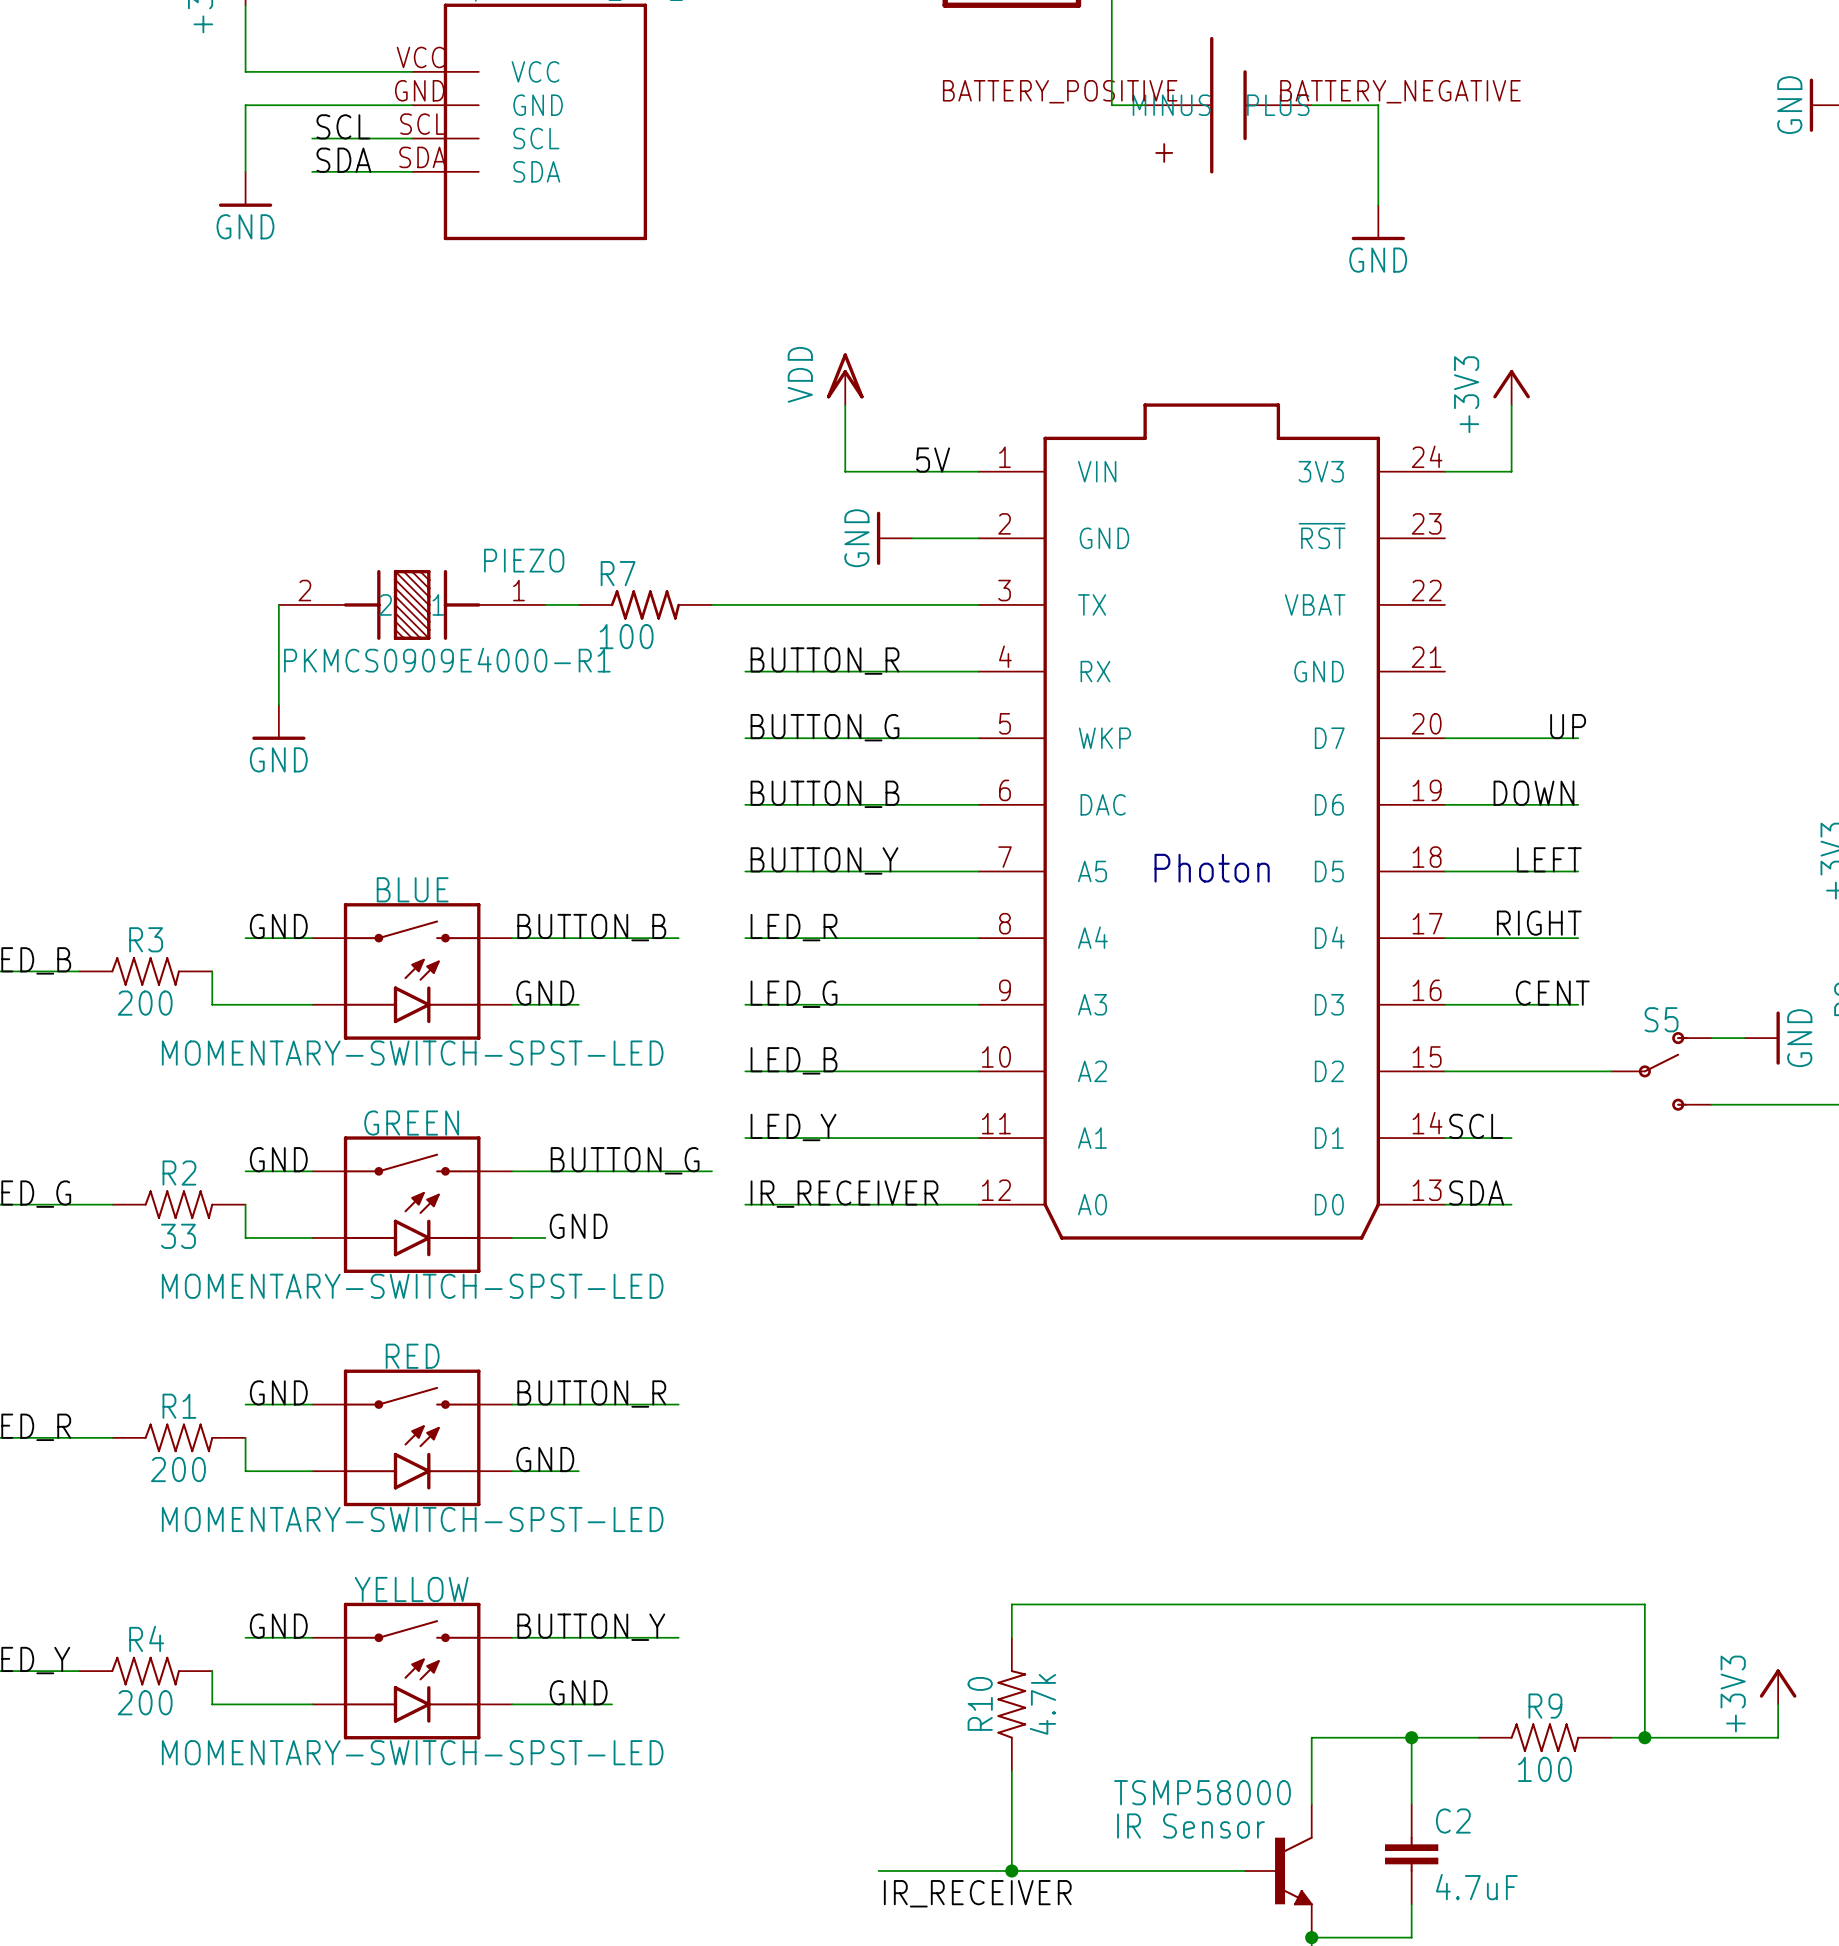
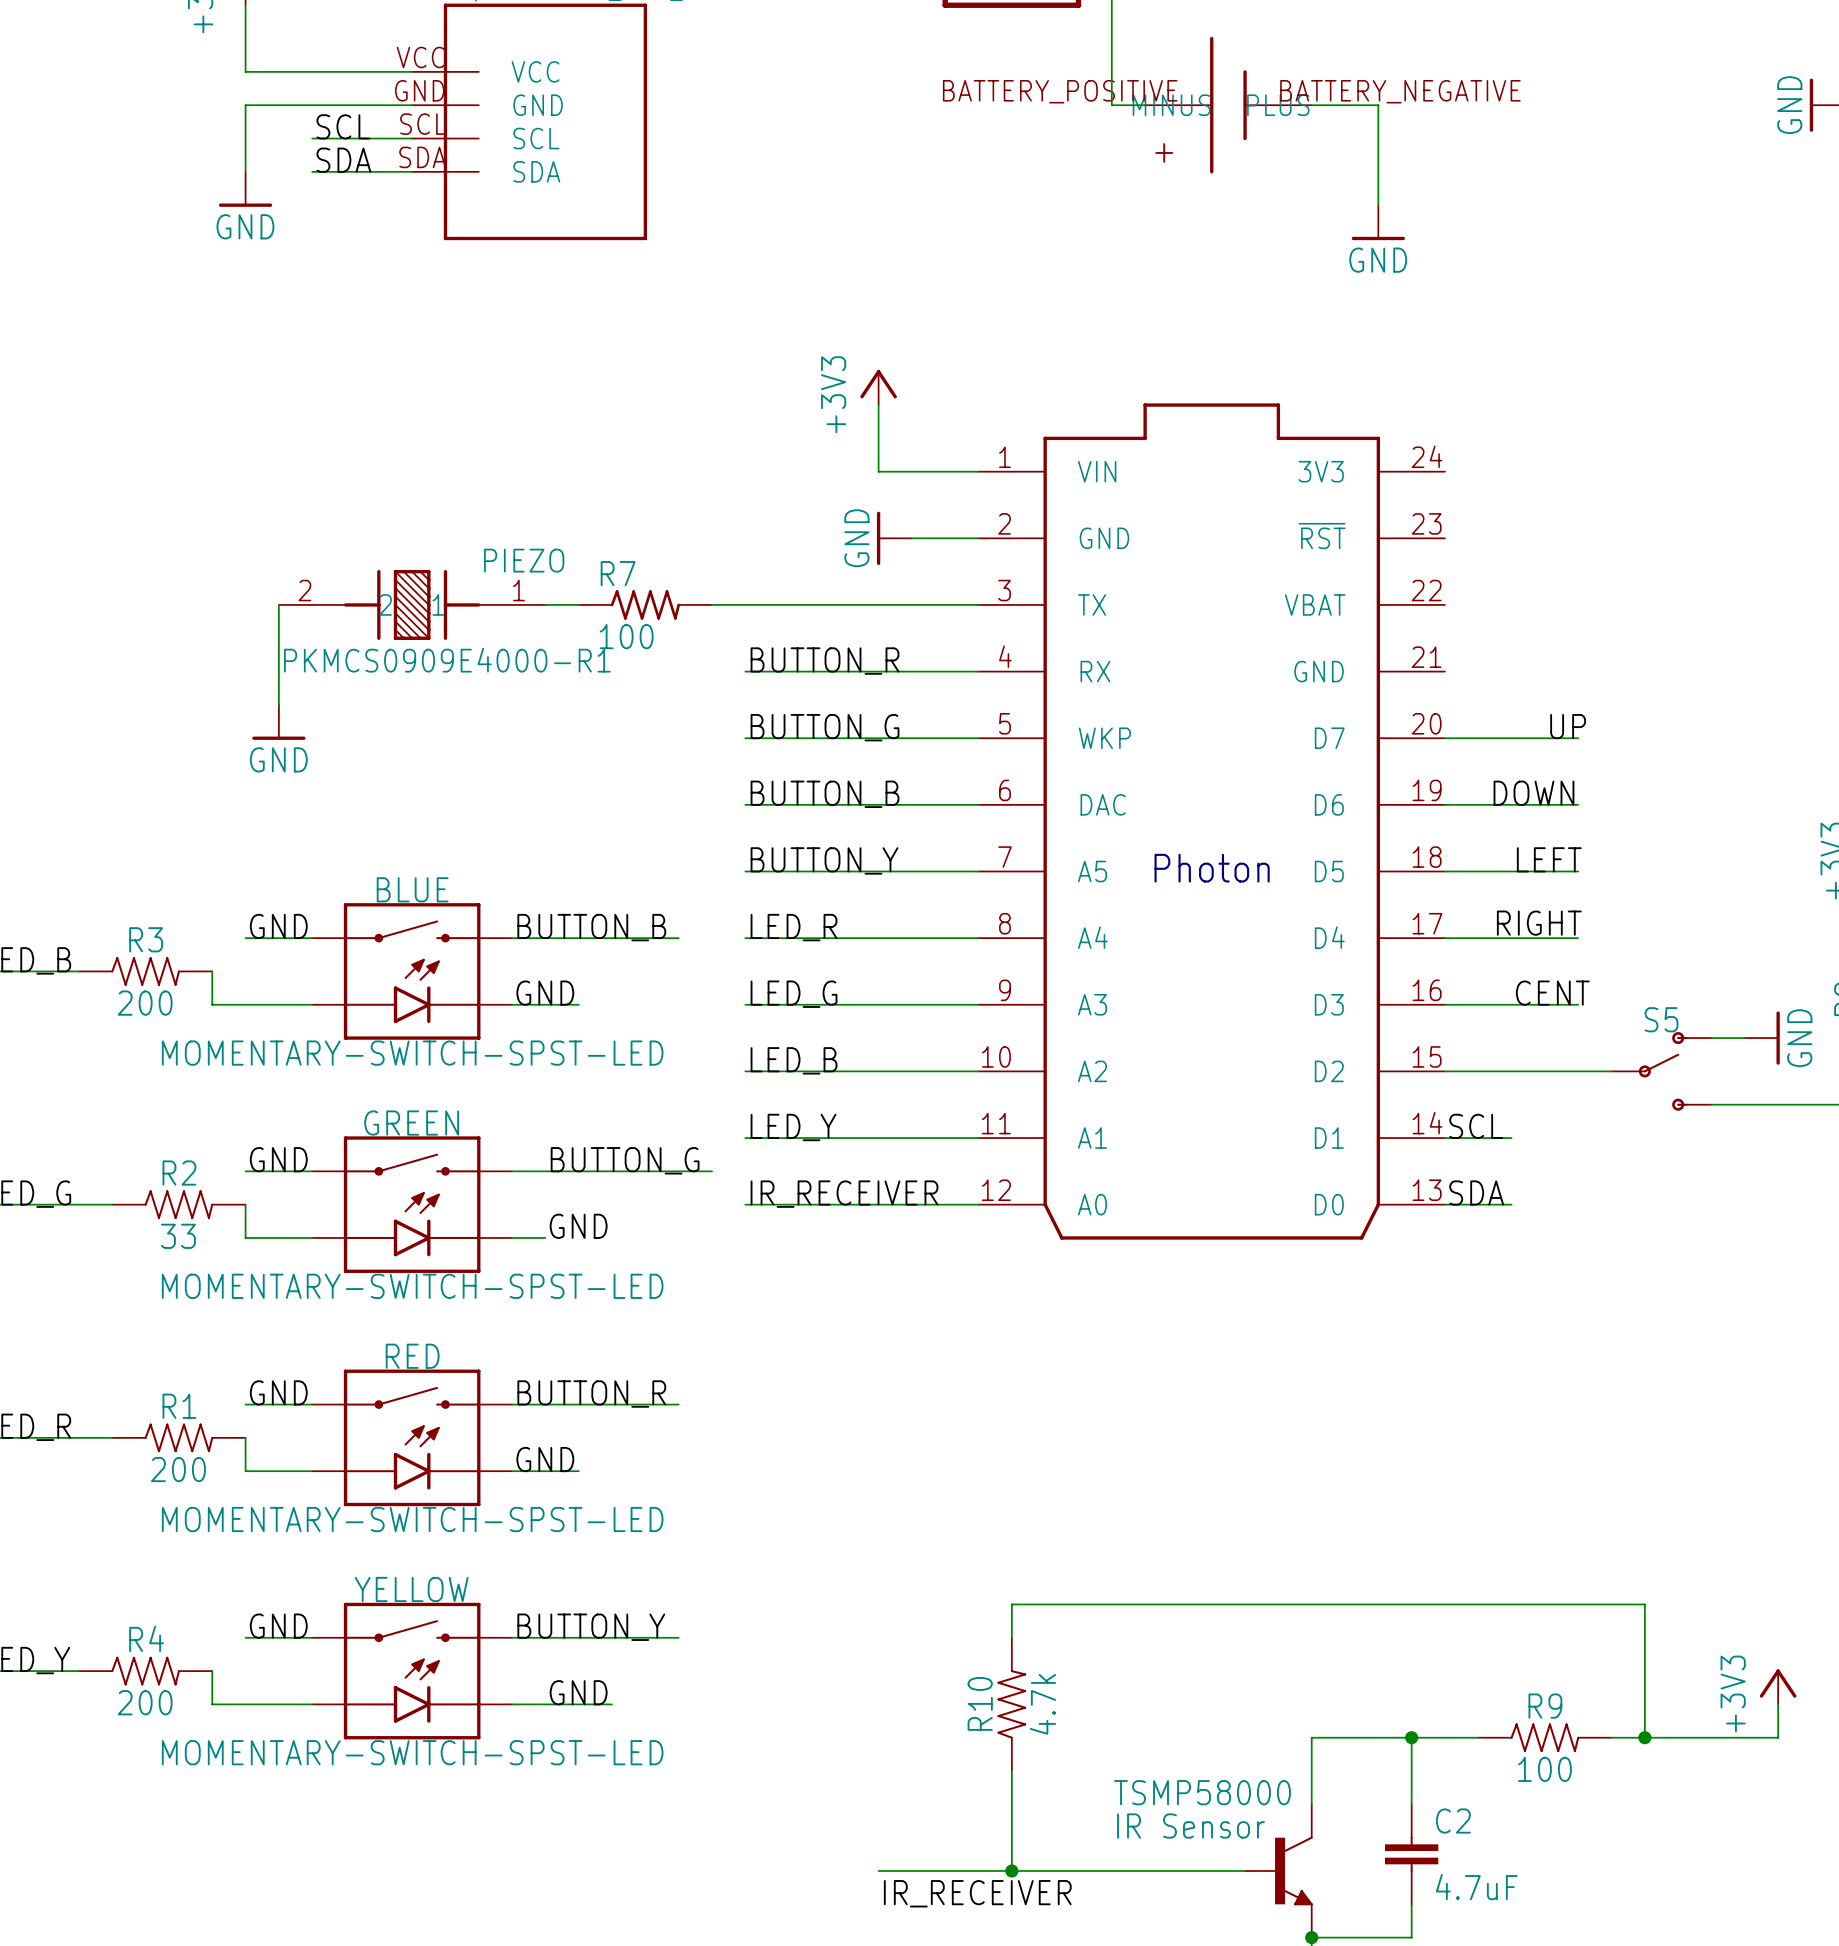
power symbol: VDD (845, 379) -> none
power symbol: none -> +3V3 (878, 387)
power symbol: +3V3 (1511, 387) -> none
wire: (845, 405) (845, 471) (878, 471) -> (878, 405) (878, 471)
wire: (1511, 405) (1511, 471) (1444, 471) -> none
label: 5V (933, 460) -> none

